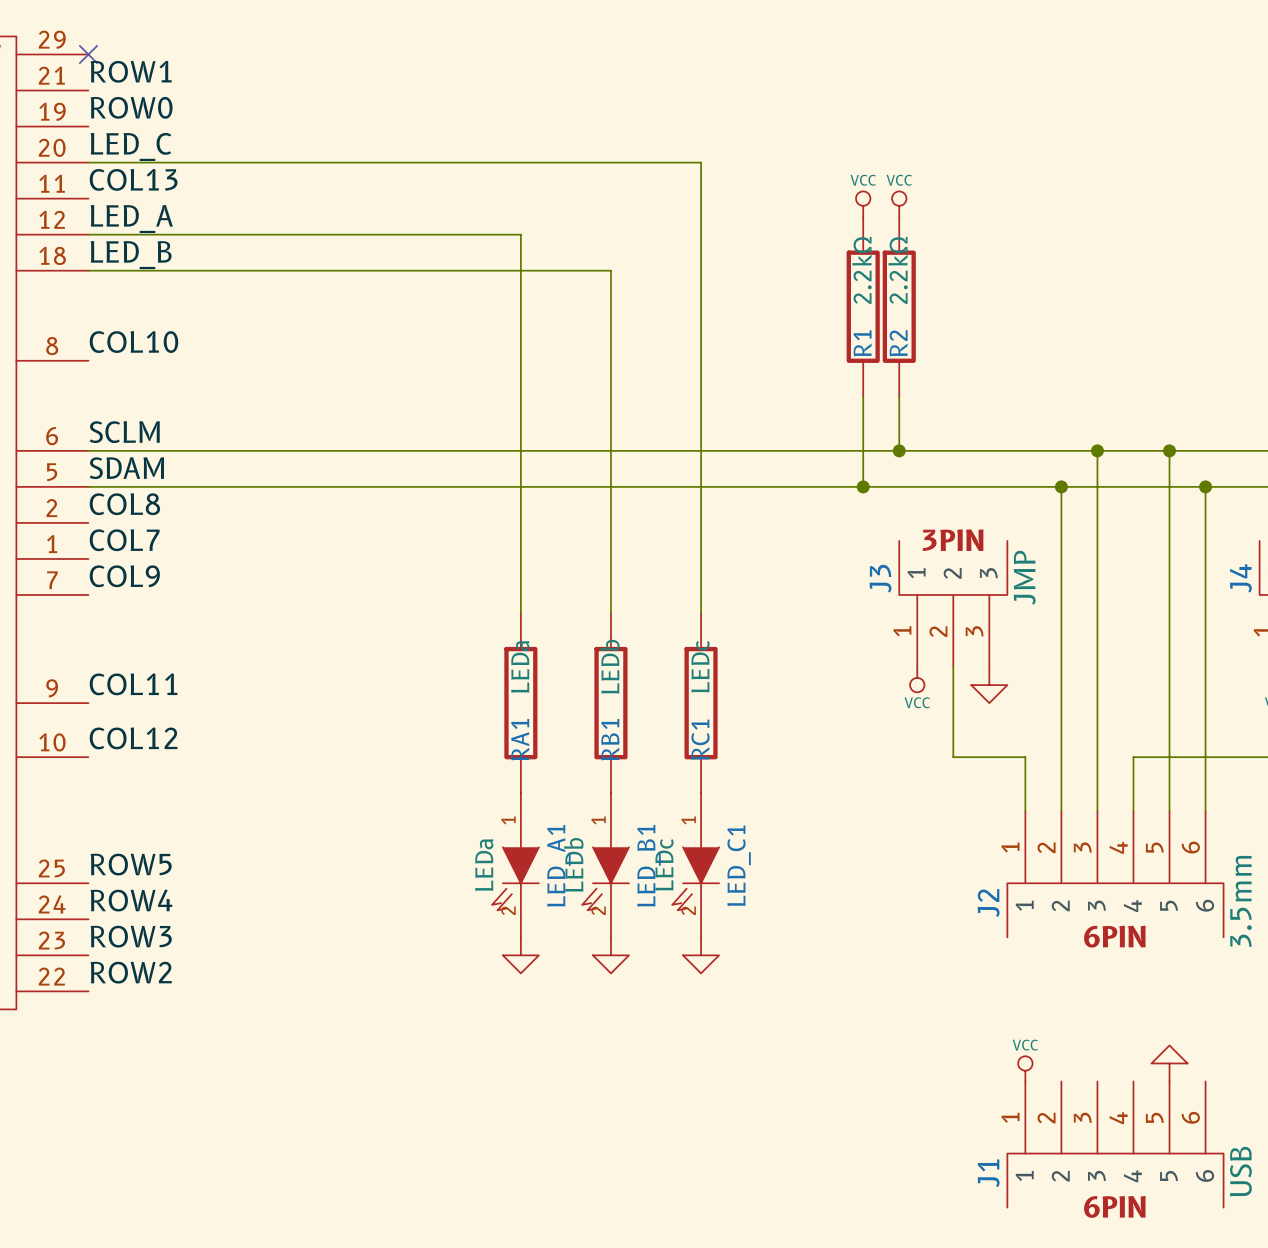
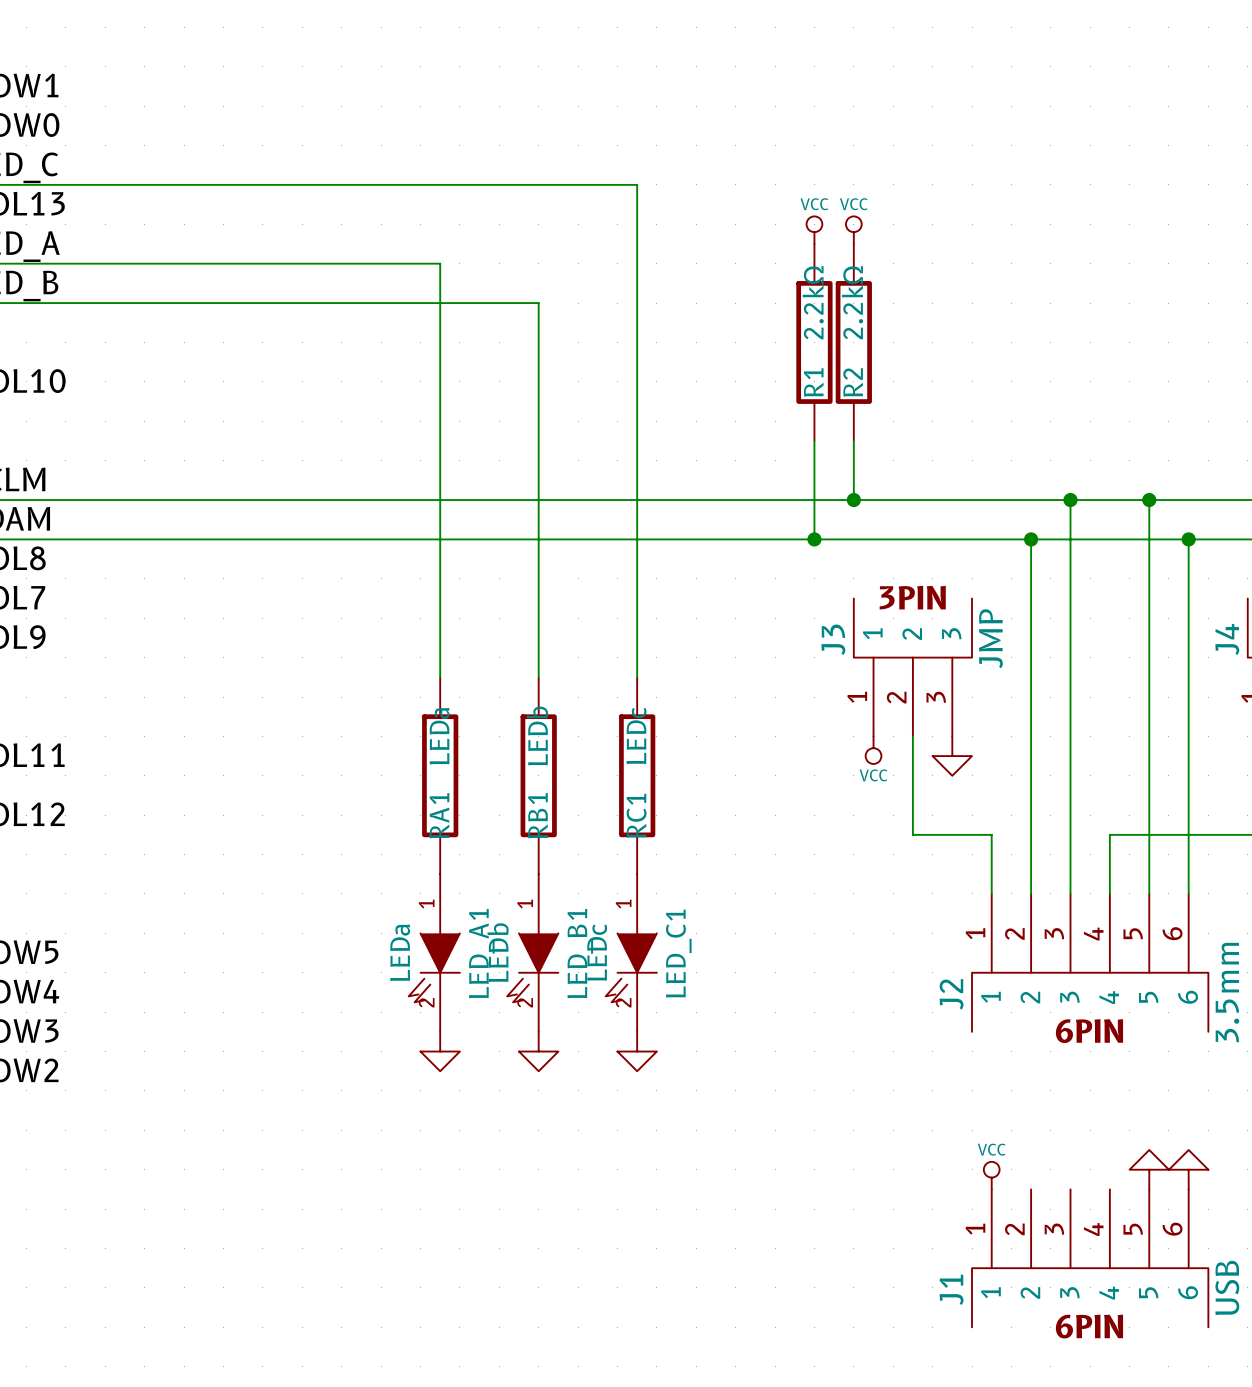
power symbol: none -> (1188, 1169)

